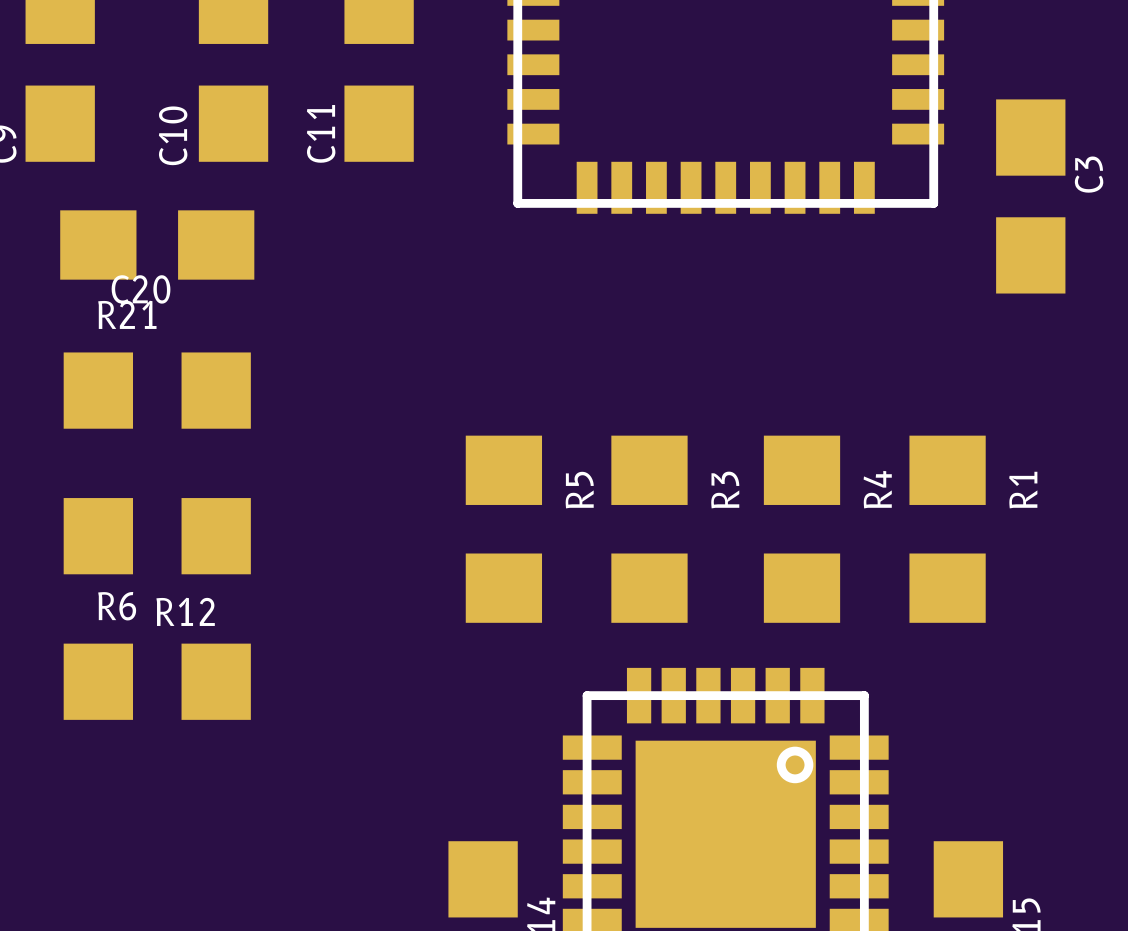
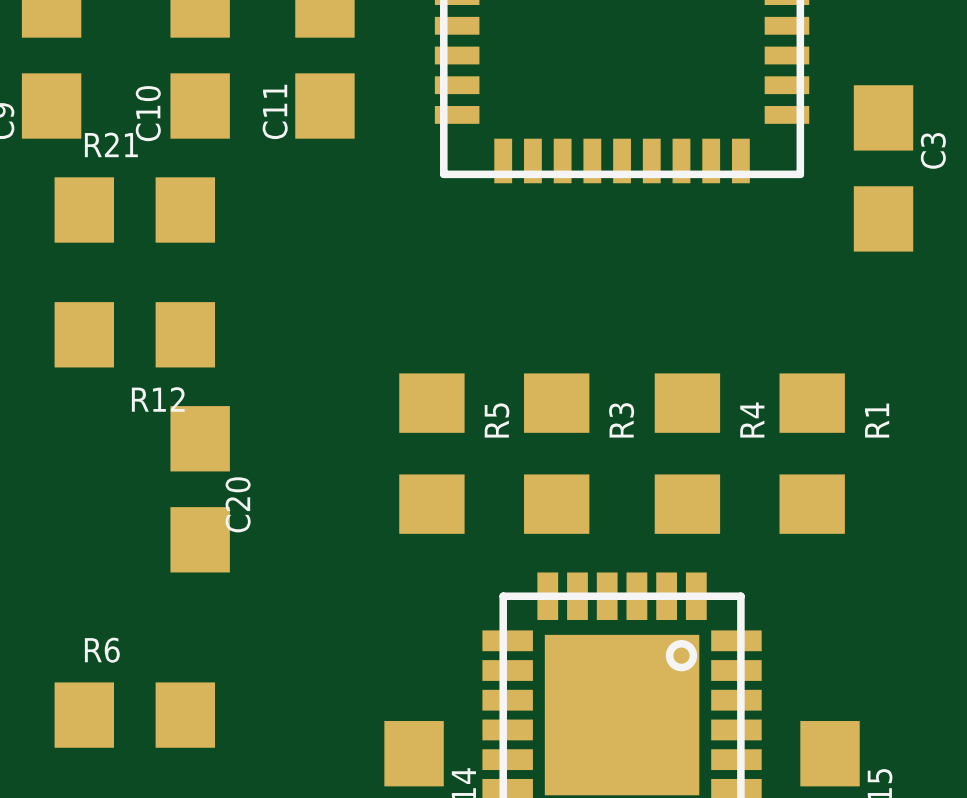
C20 rotation: 0° (157, 245) -> 90° clockwise (200, 489)
C20 position: (157, 245) -> (200, 489)
R21: none -> (134, 210)
R21 name: R21 (127, 314) -> R12 (158, 399)
R12: (157, 536) -> none
R6 position: (157, 681) -> (134, 715)

